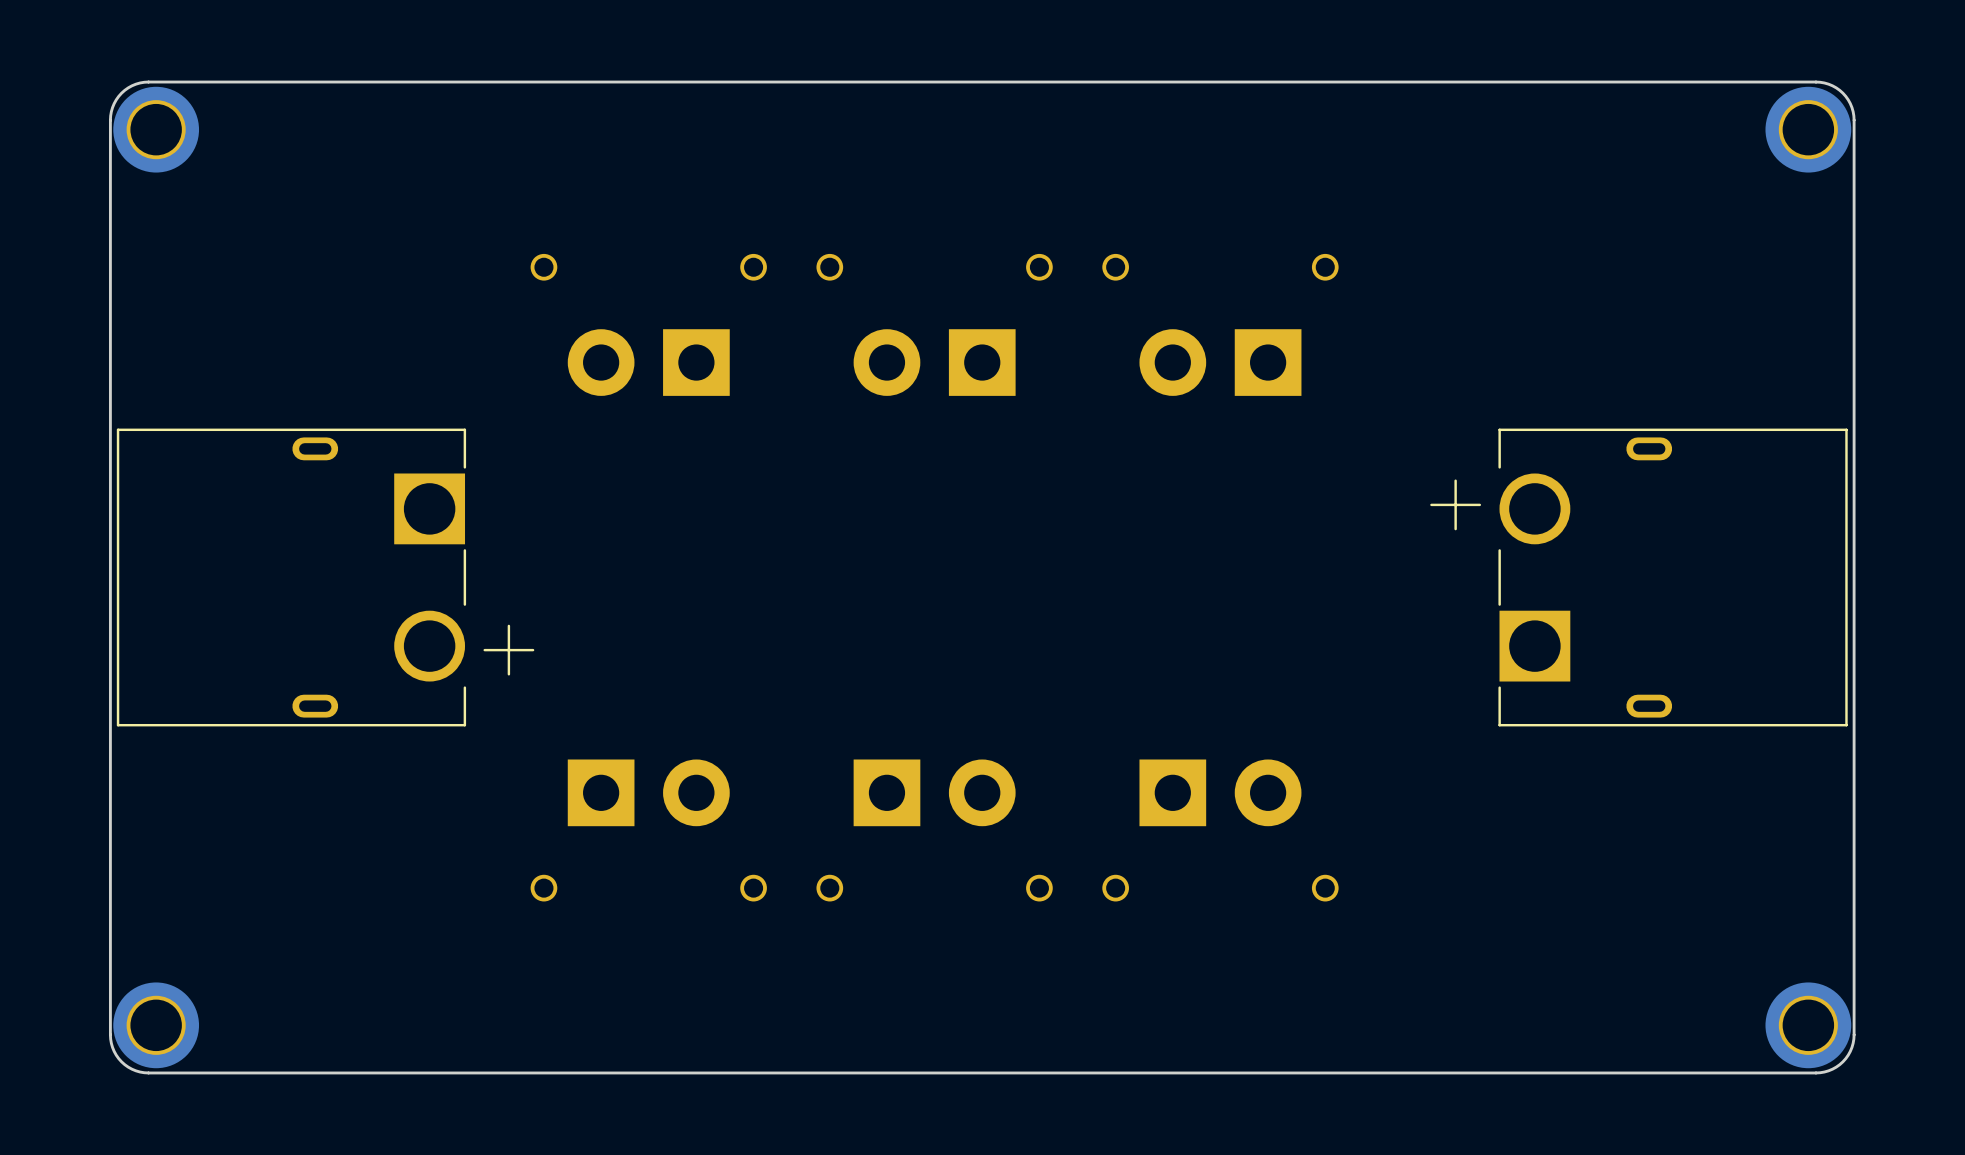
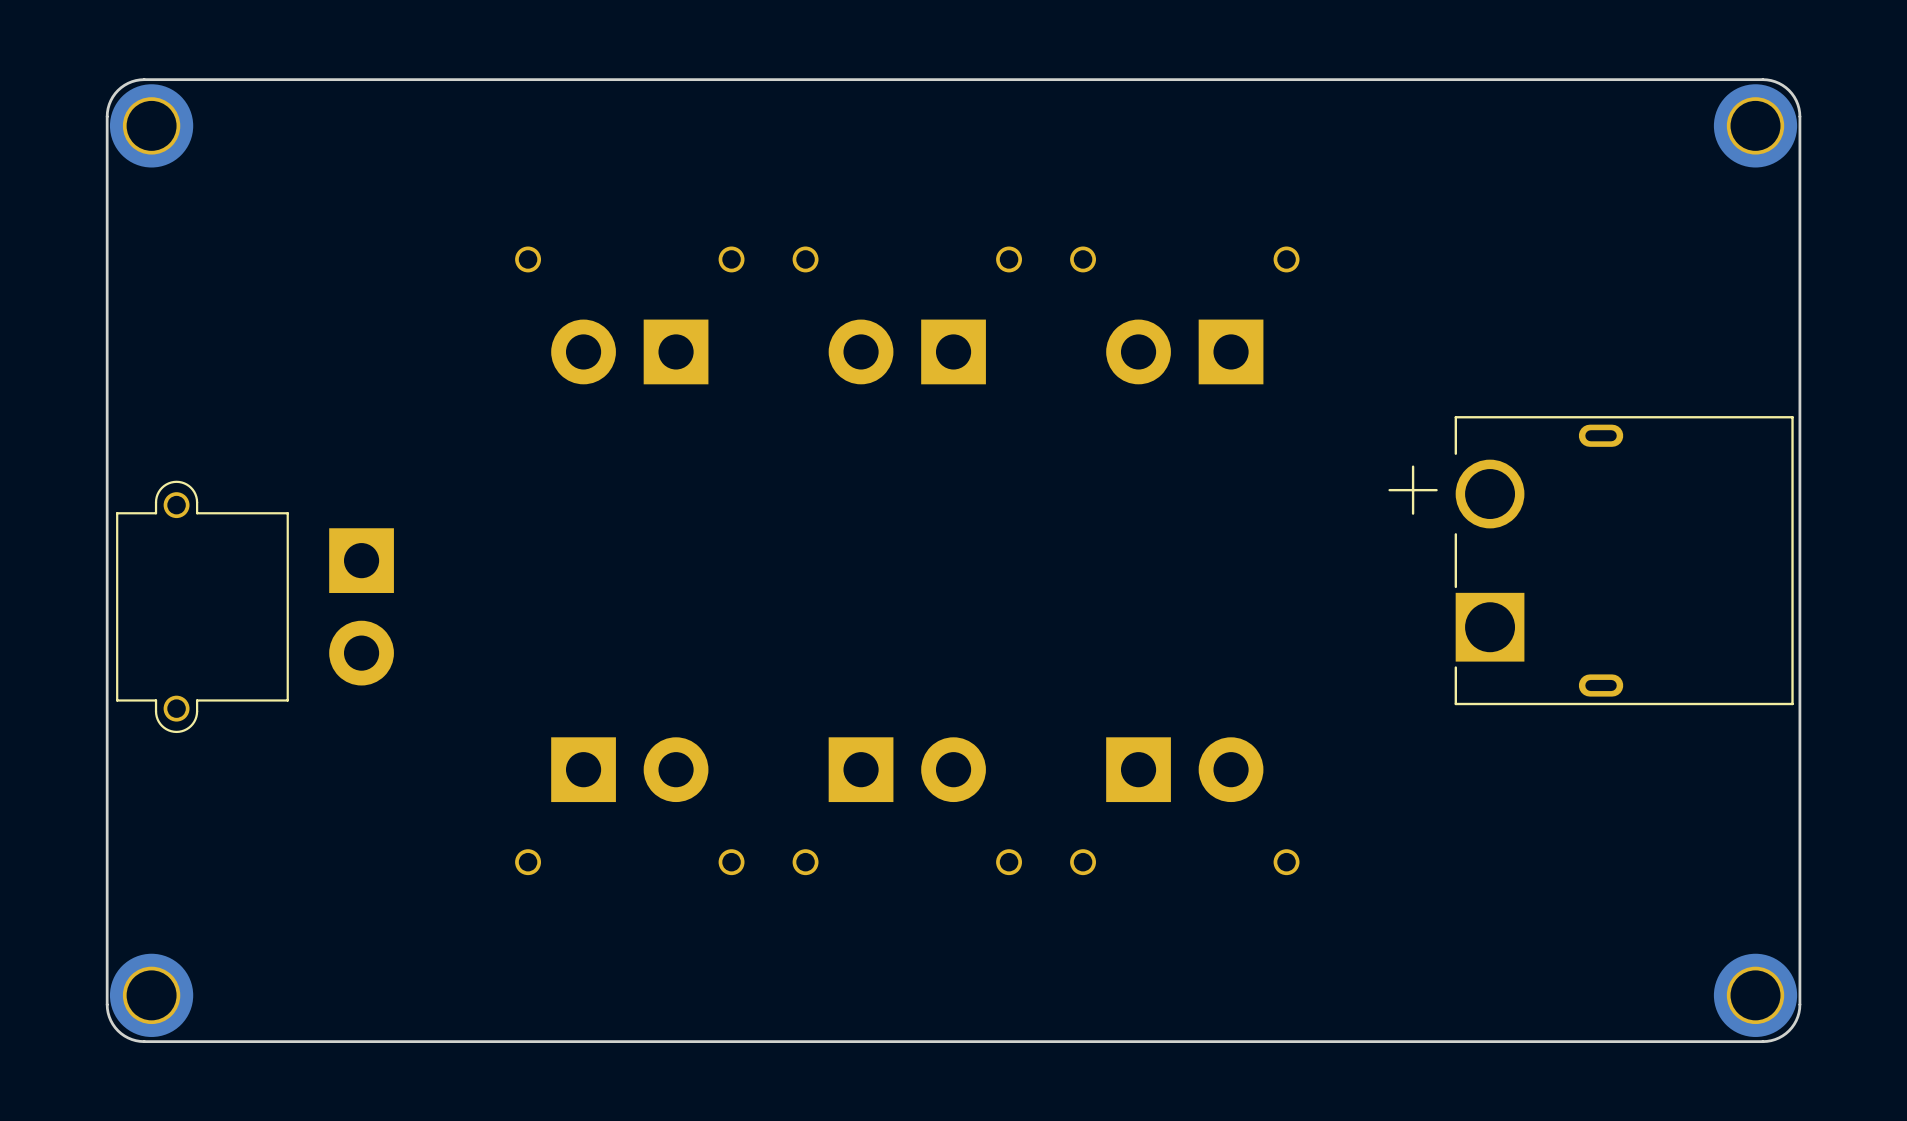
part: (325, 577) -> none
part: none -> (255, 606)

